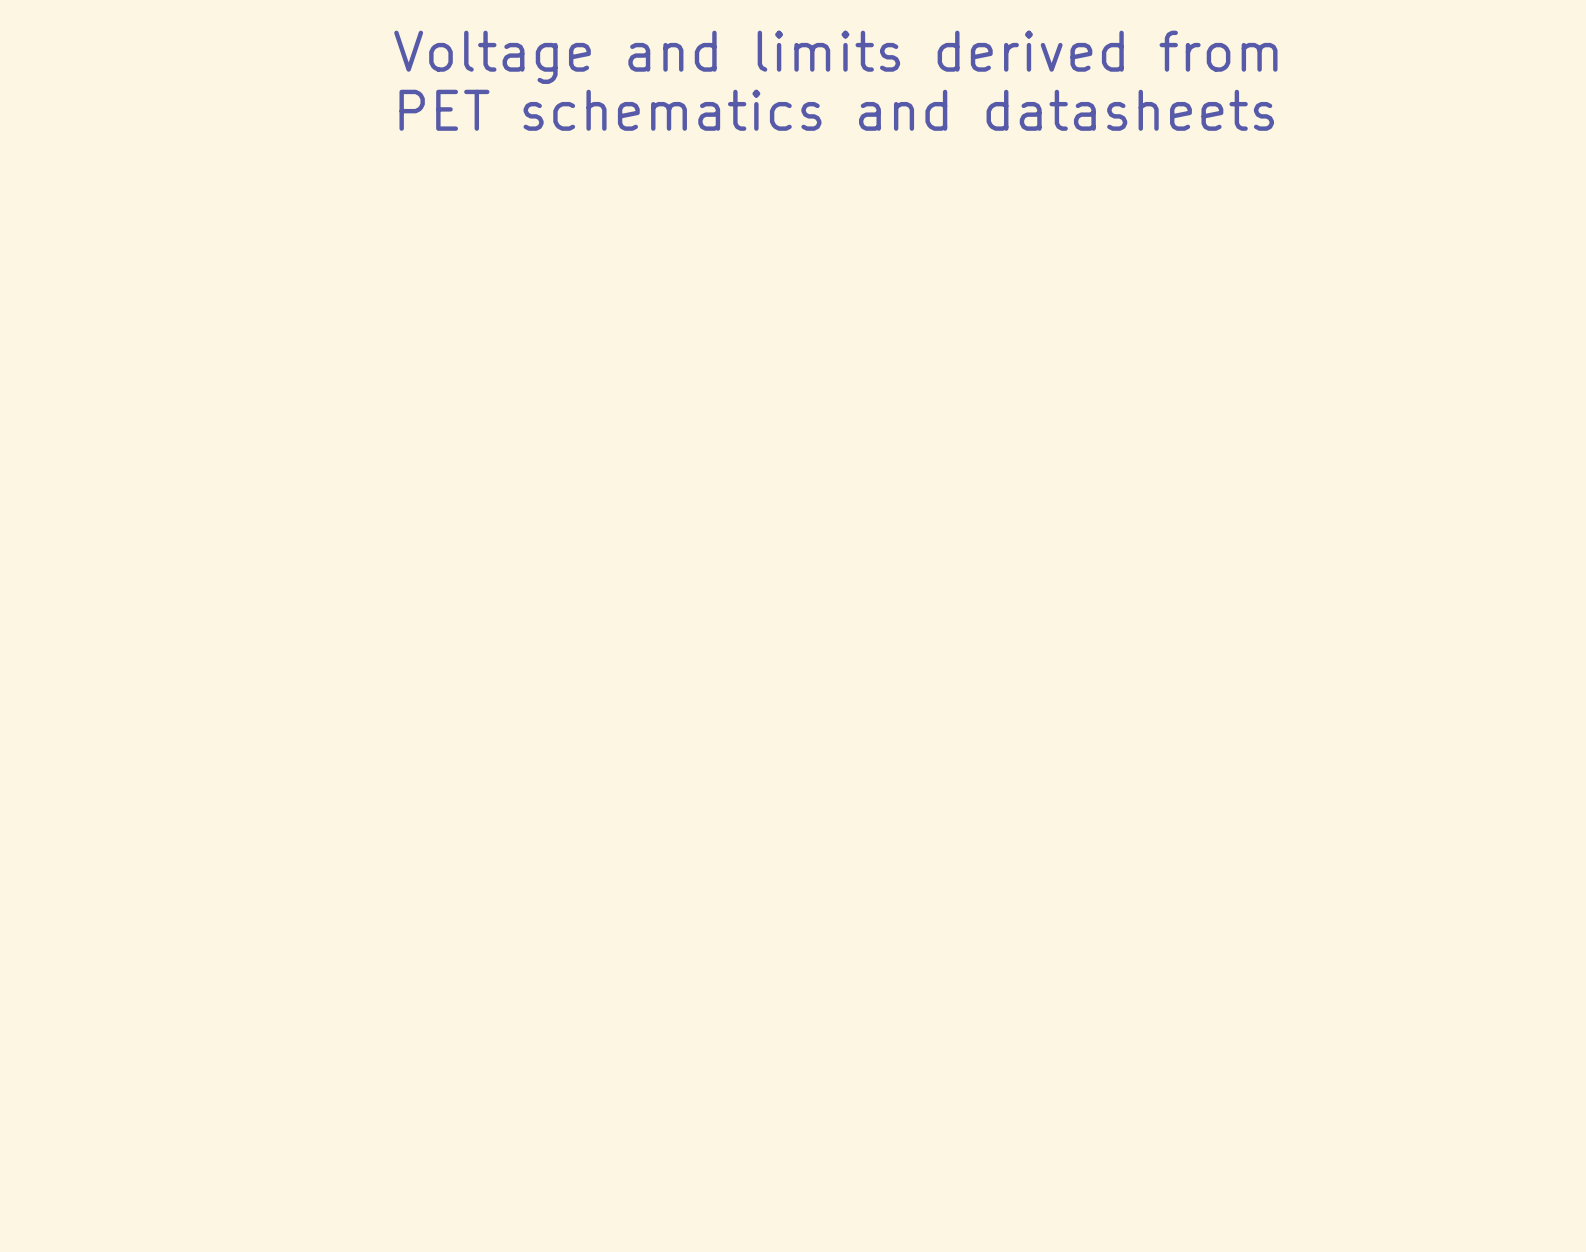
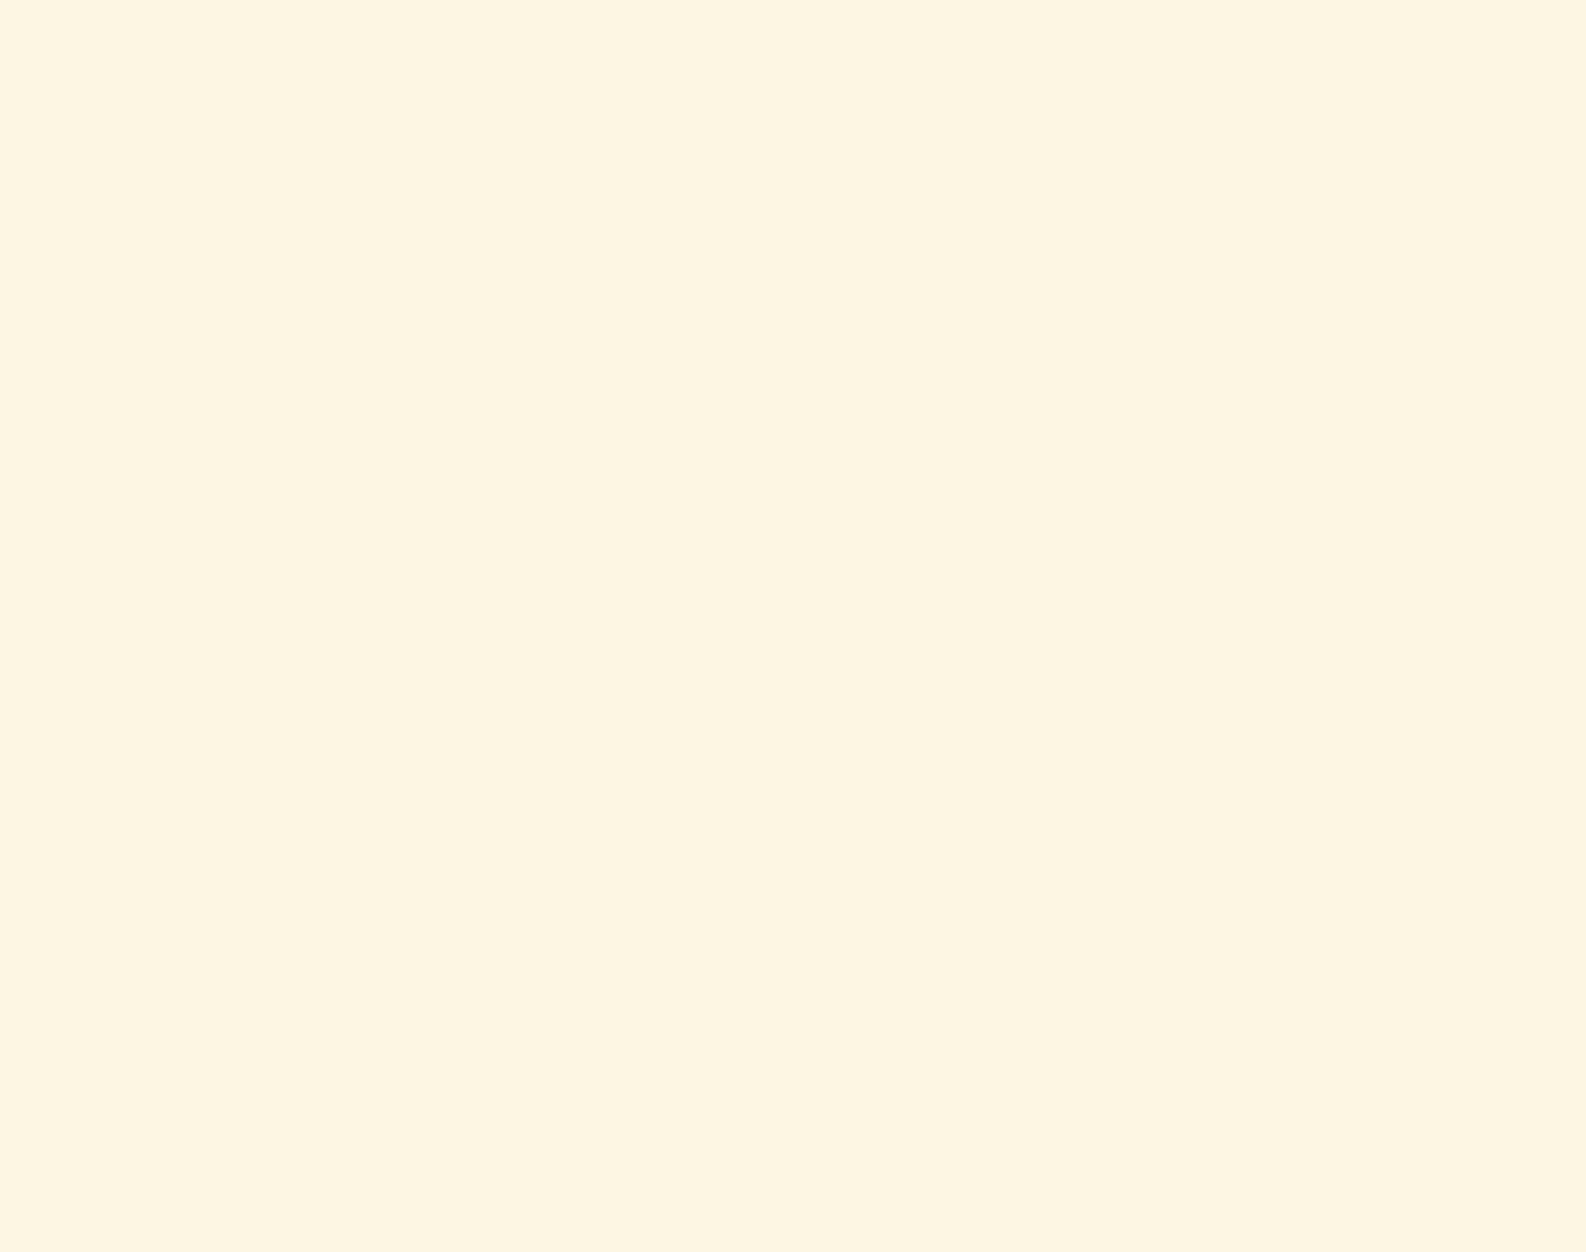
text: Voltage and limits derived from (835, 57) -> none
text: PET schematics and datasheets (836, 110) -> none

